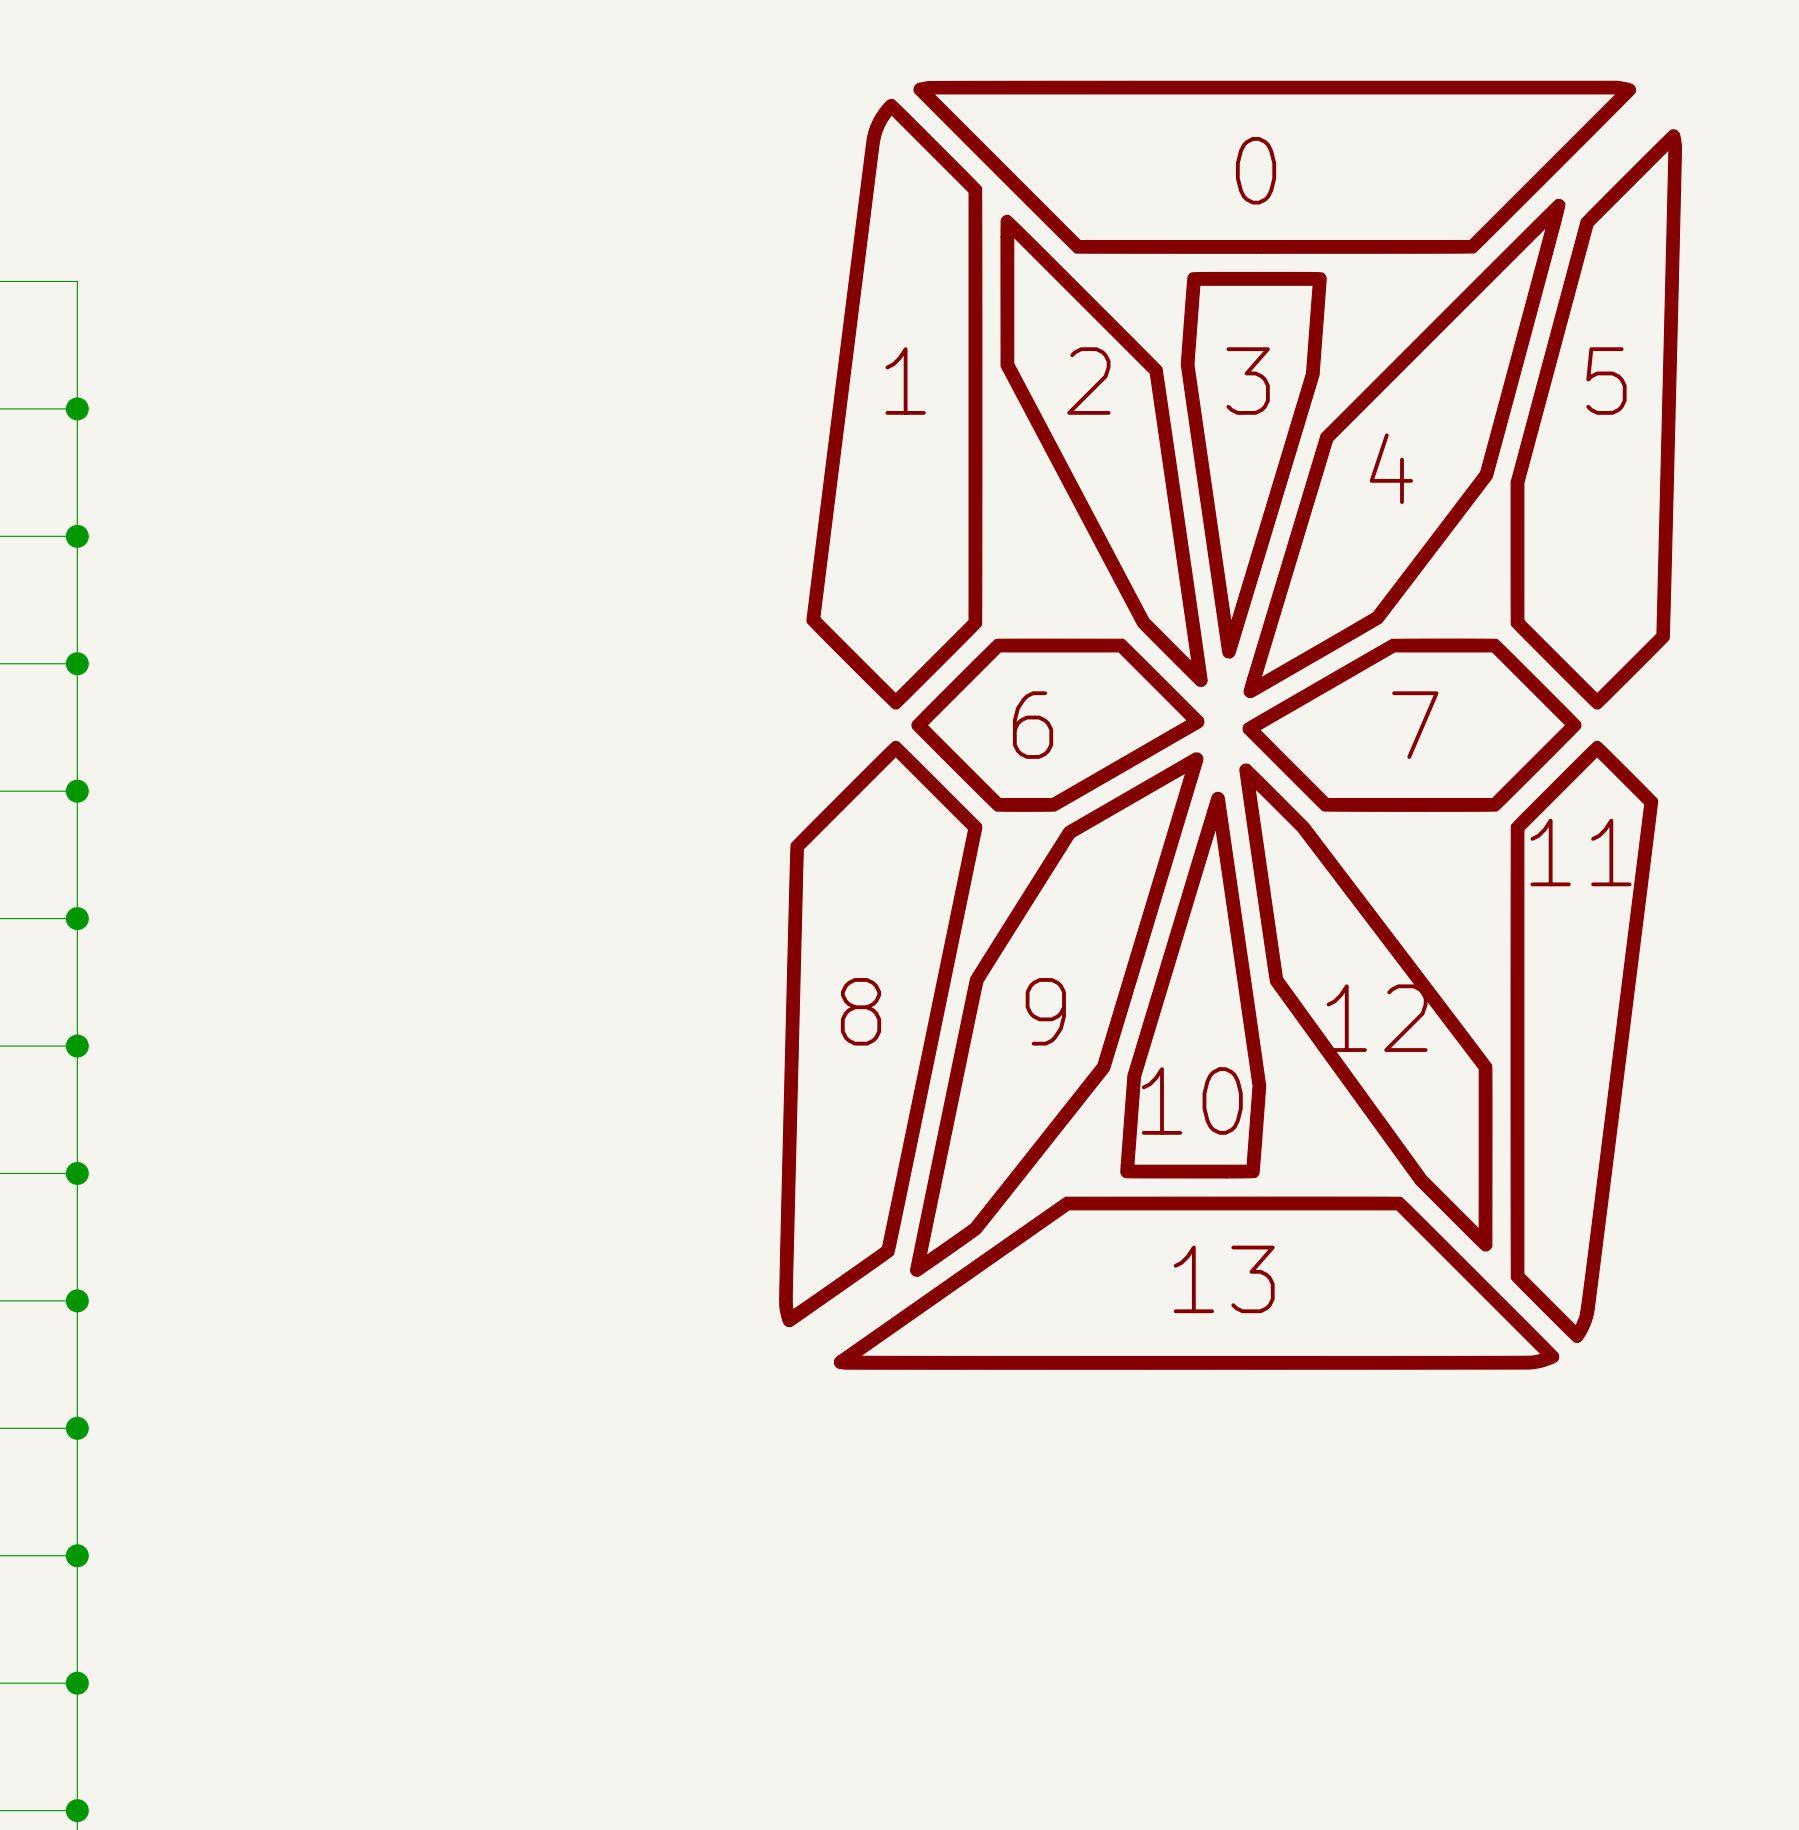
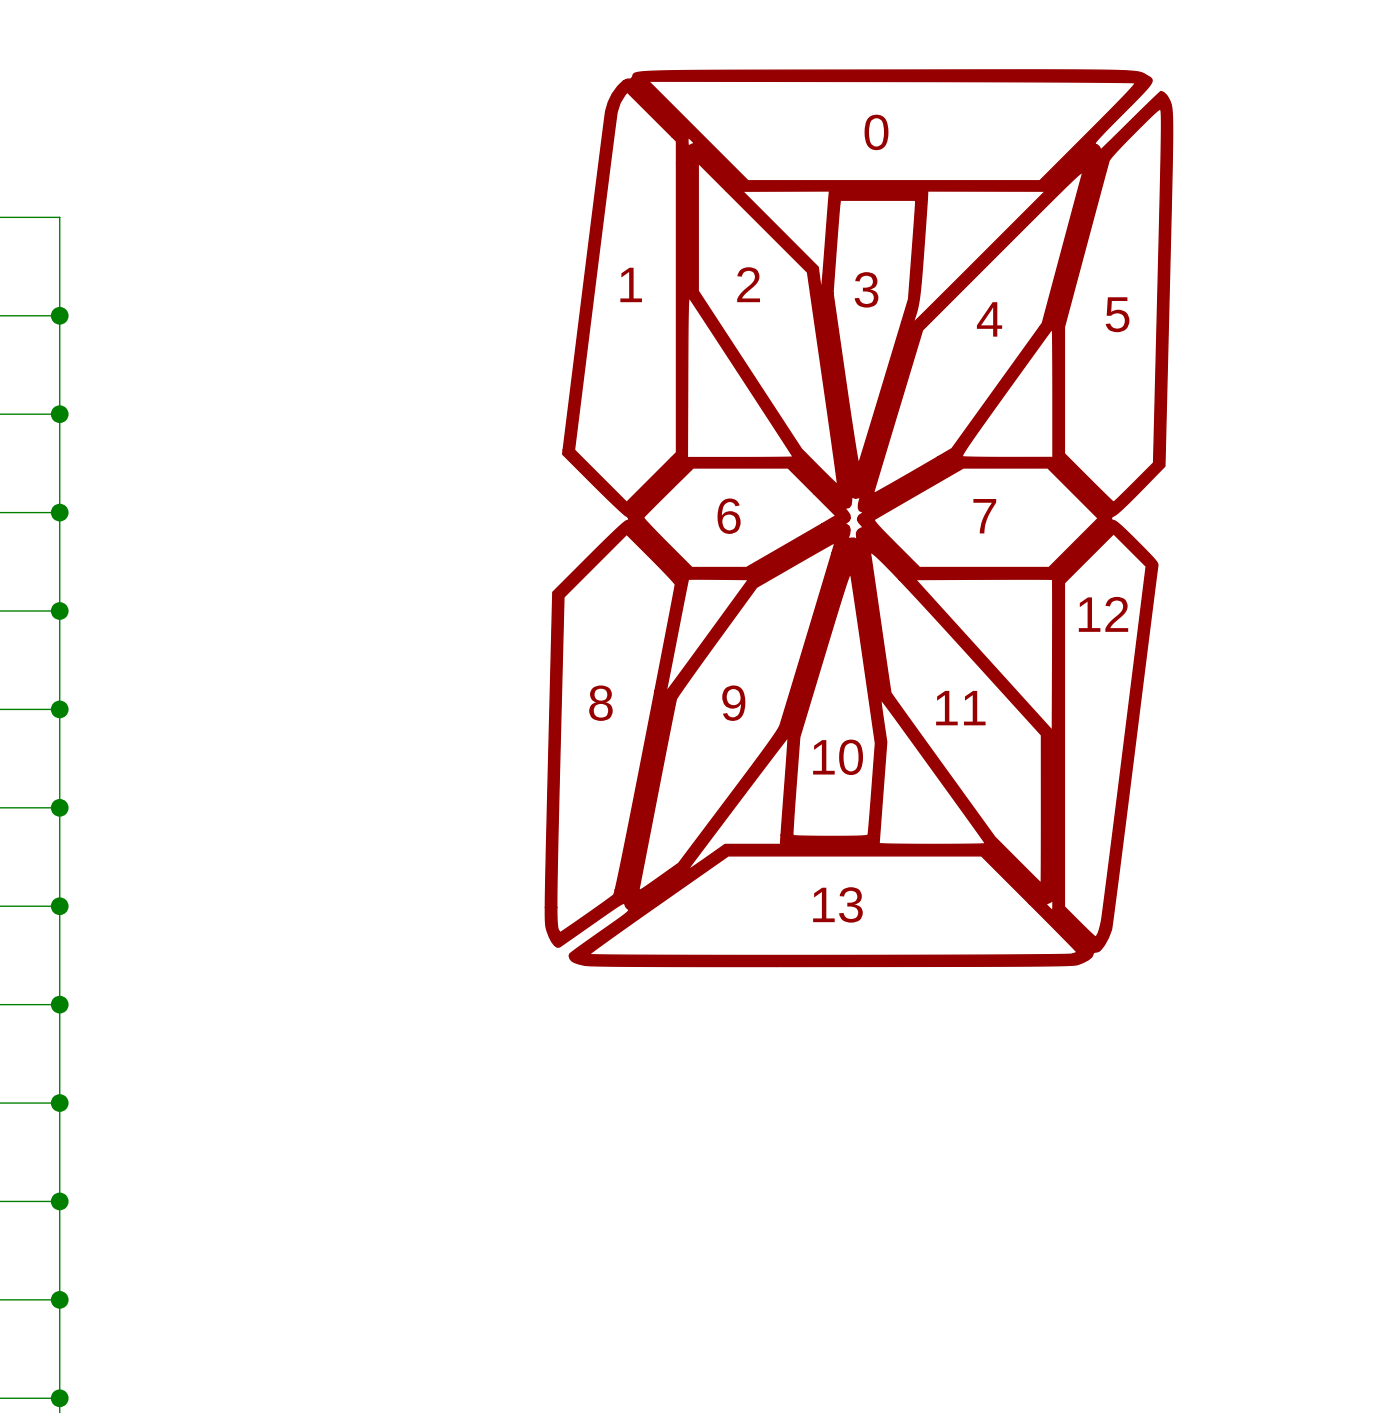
power symbol: none -> (858, 518)
power symbol: (1230, 725) -> none

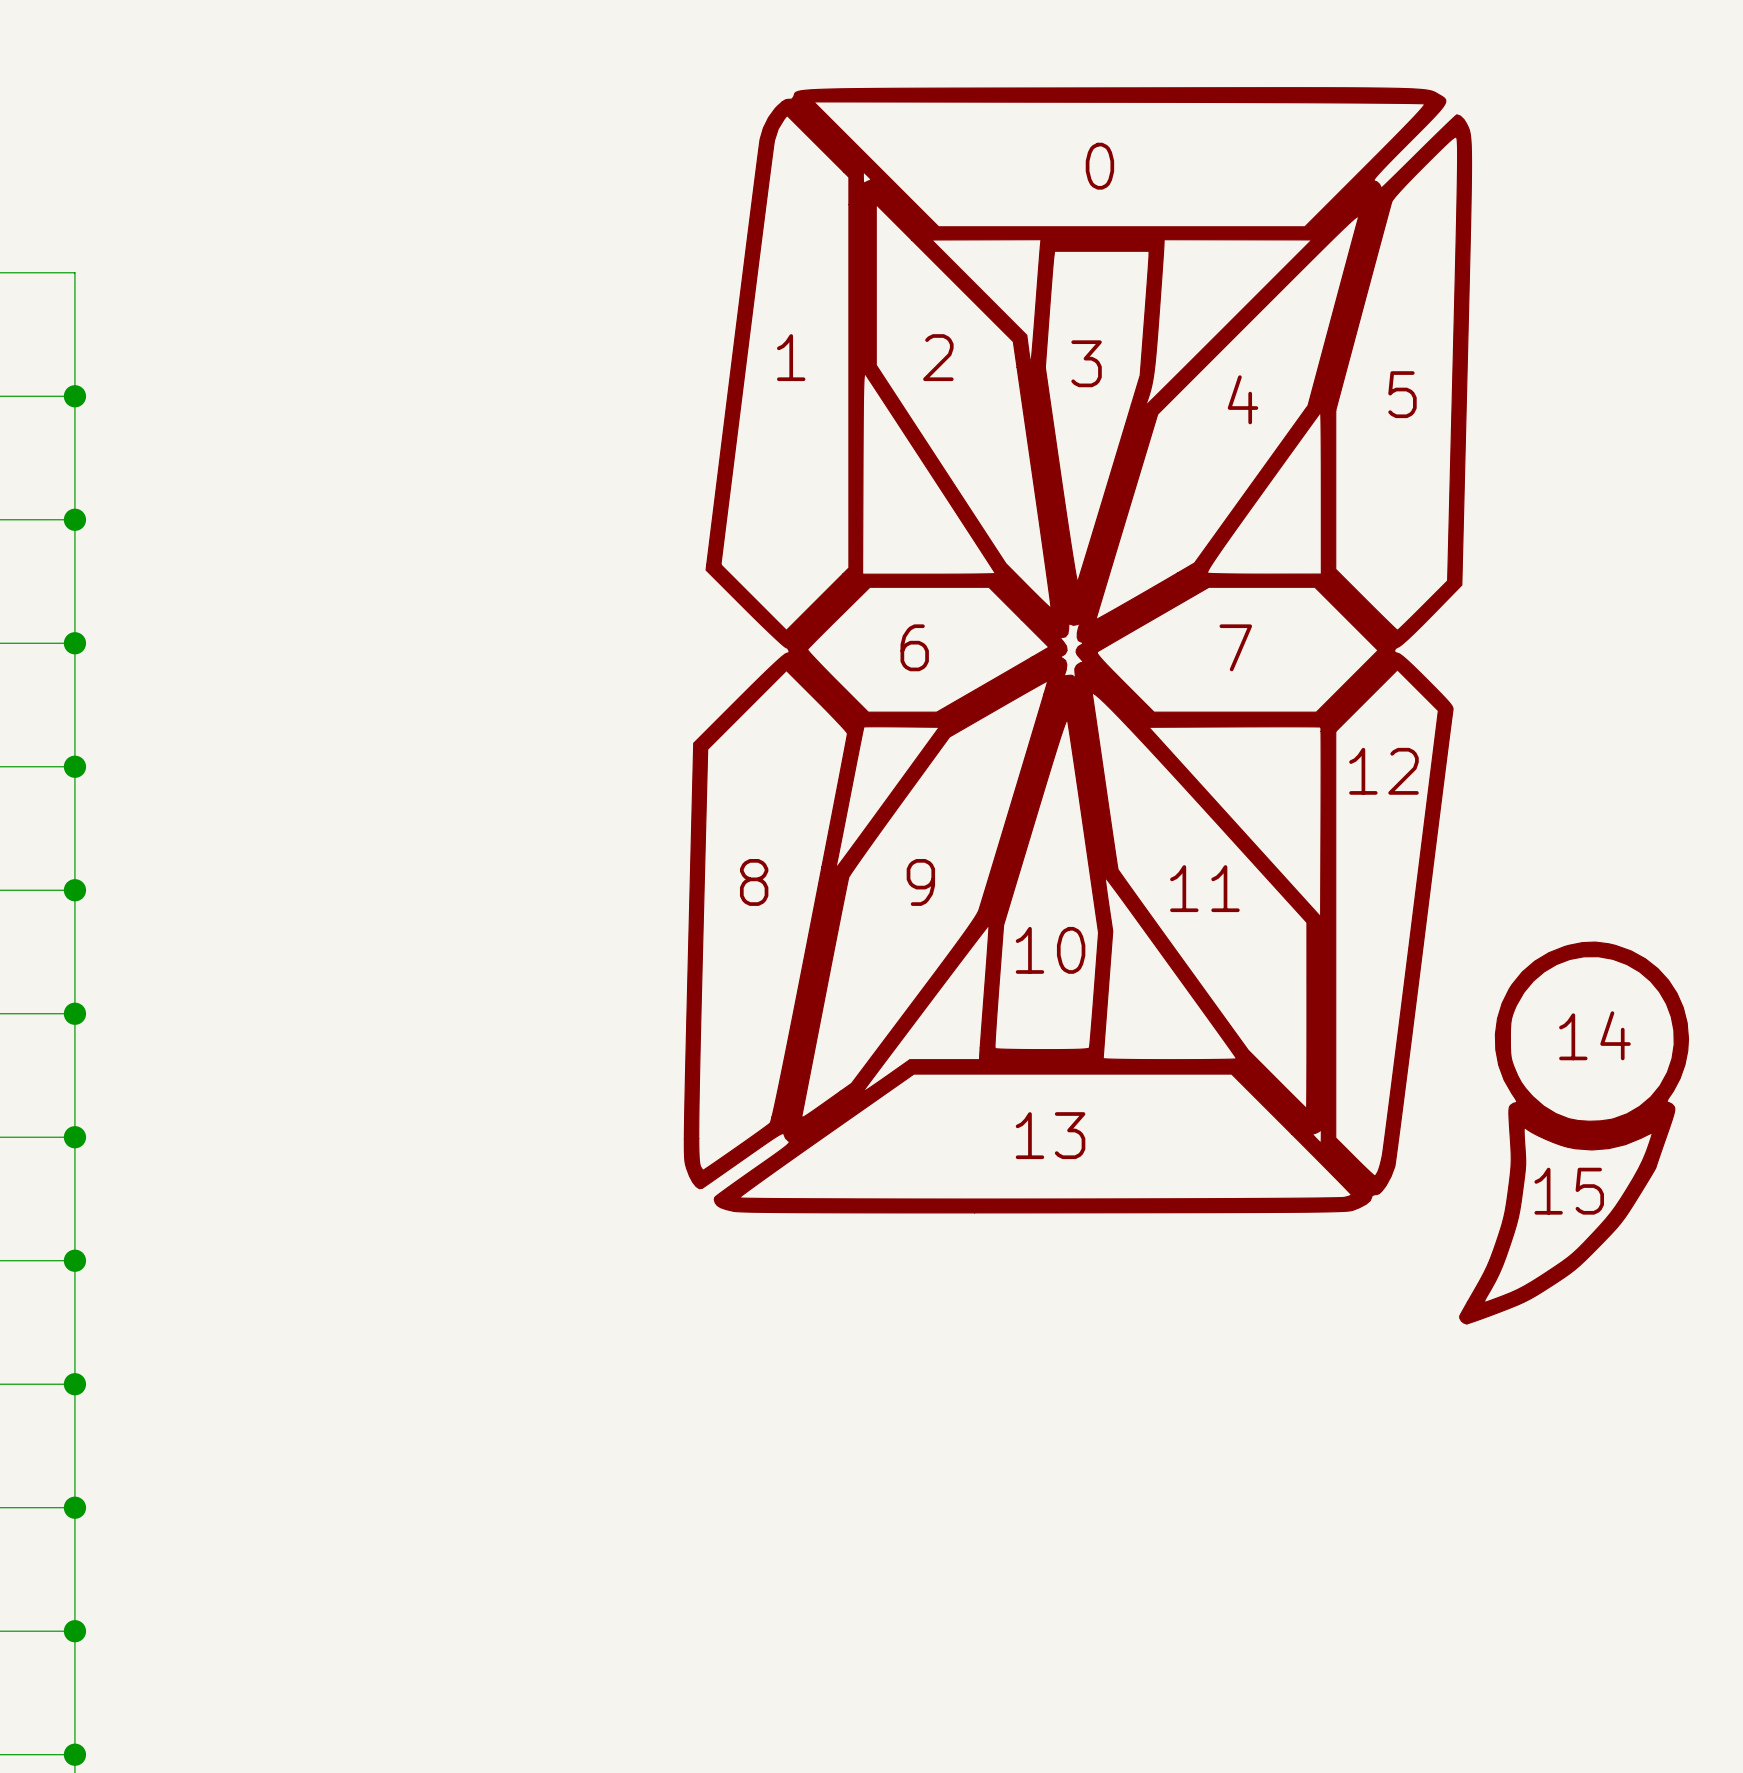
power symbol: none -> (1186, 705)

